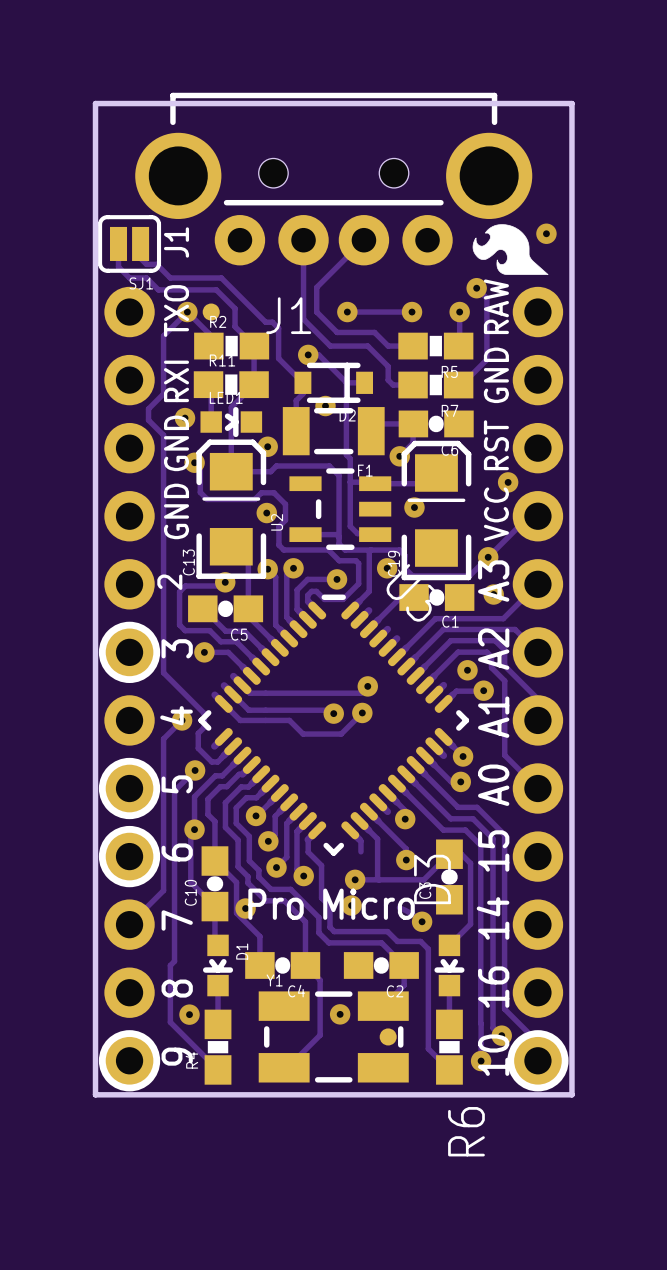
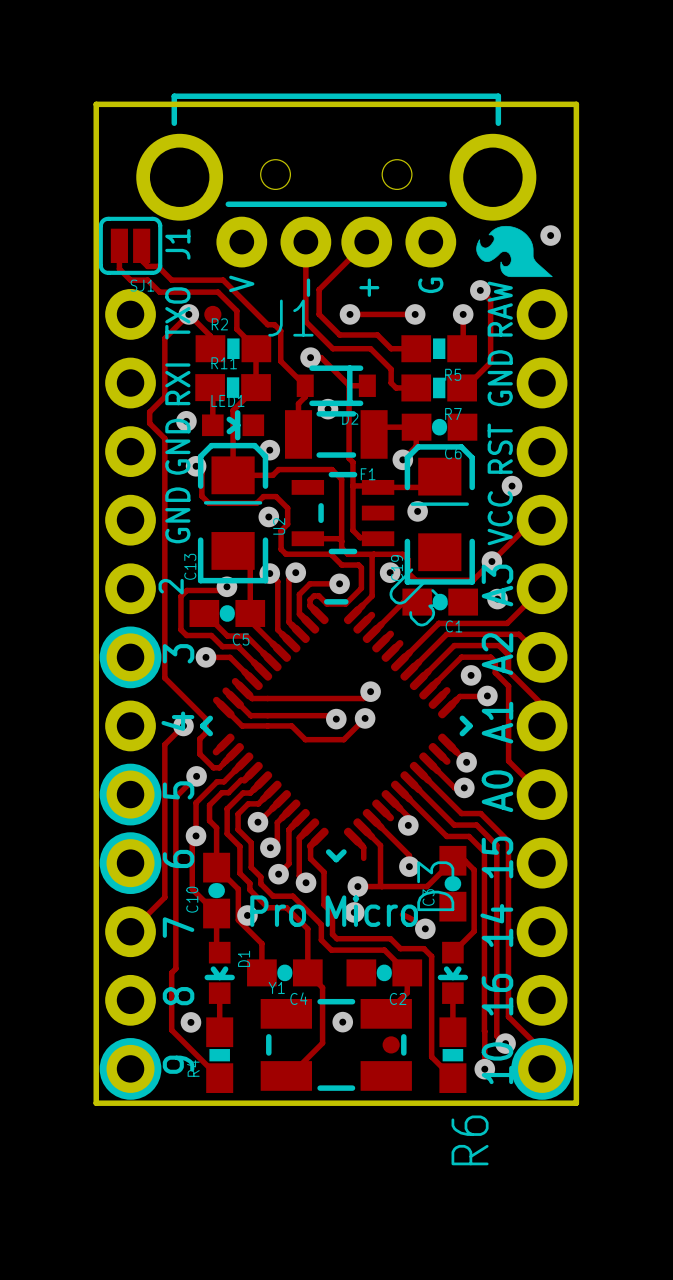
text: none -> V (241, 283)
text: none -> G (430, 285)
text: none -> - (308, 287)
text: none -> + (369, 287)

